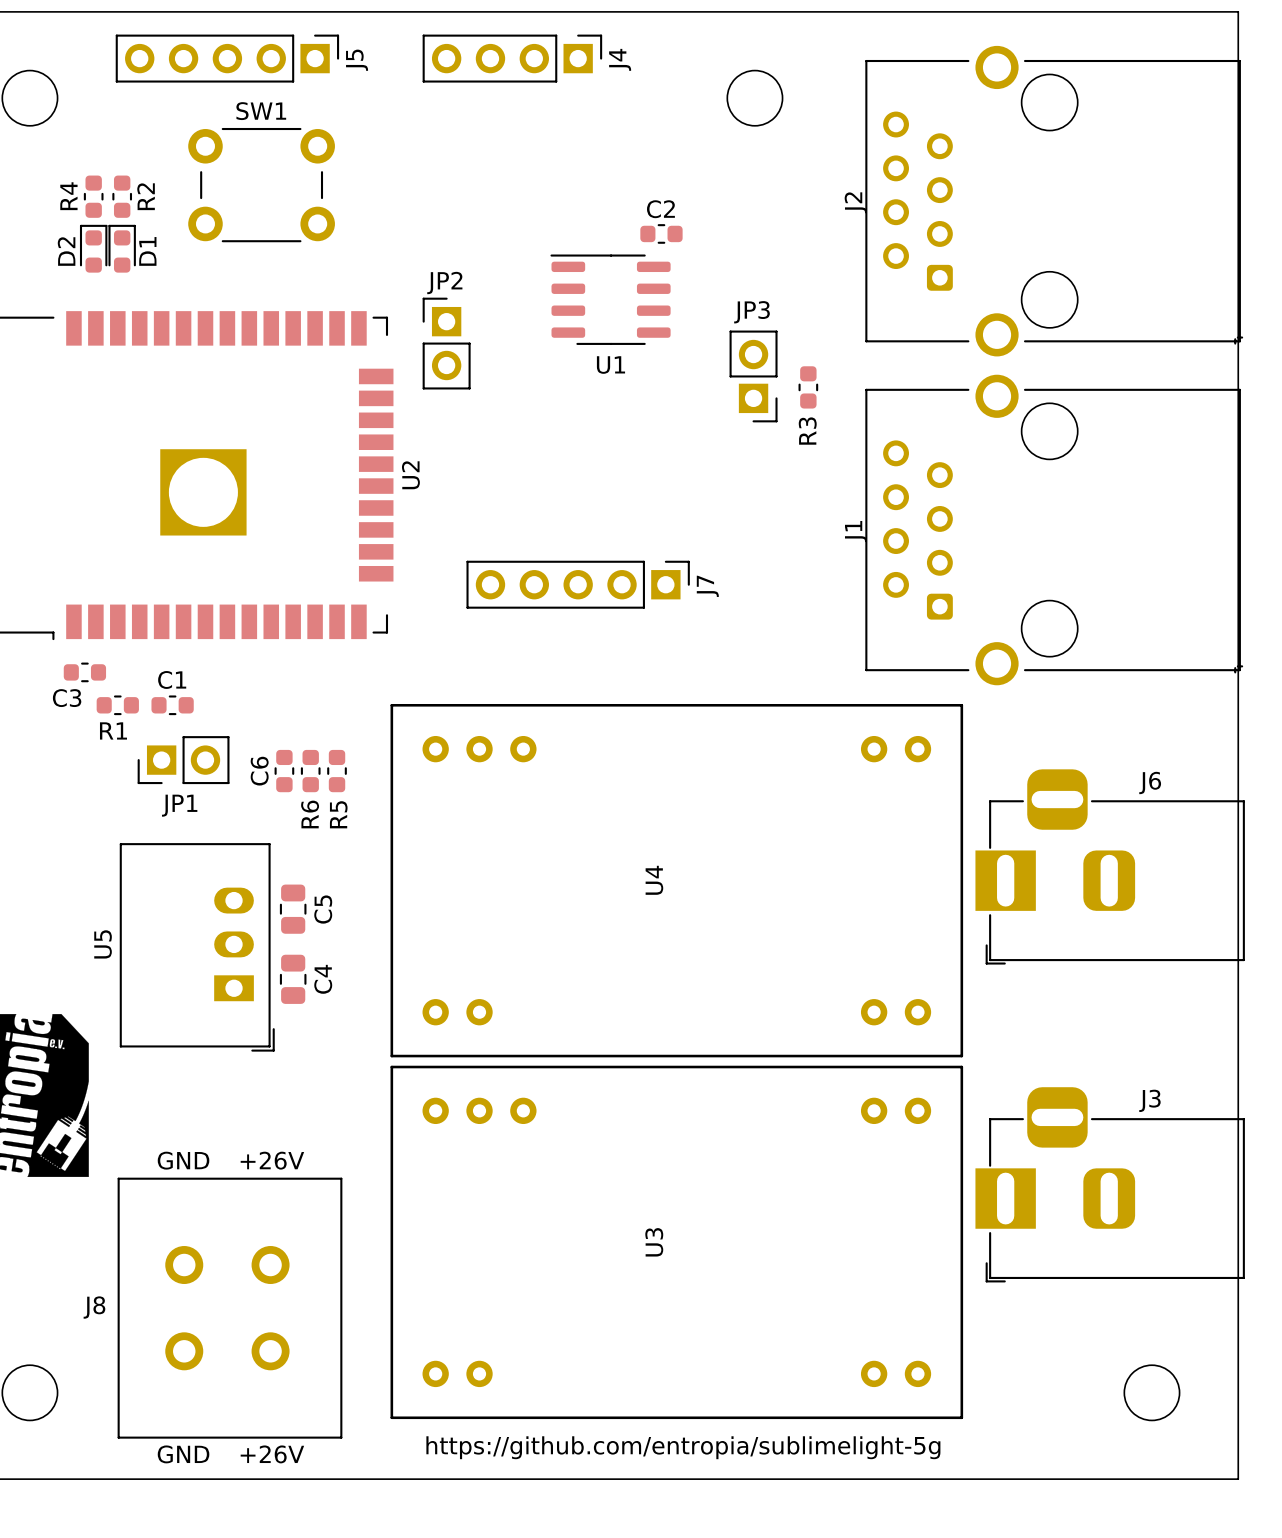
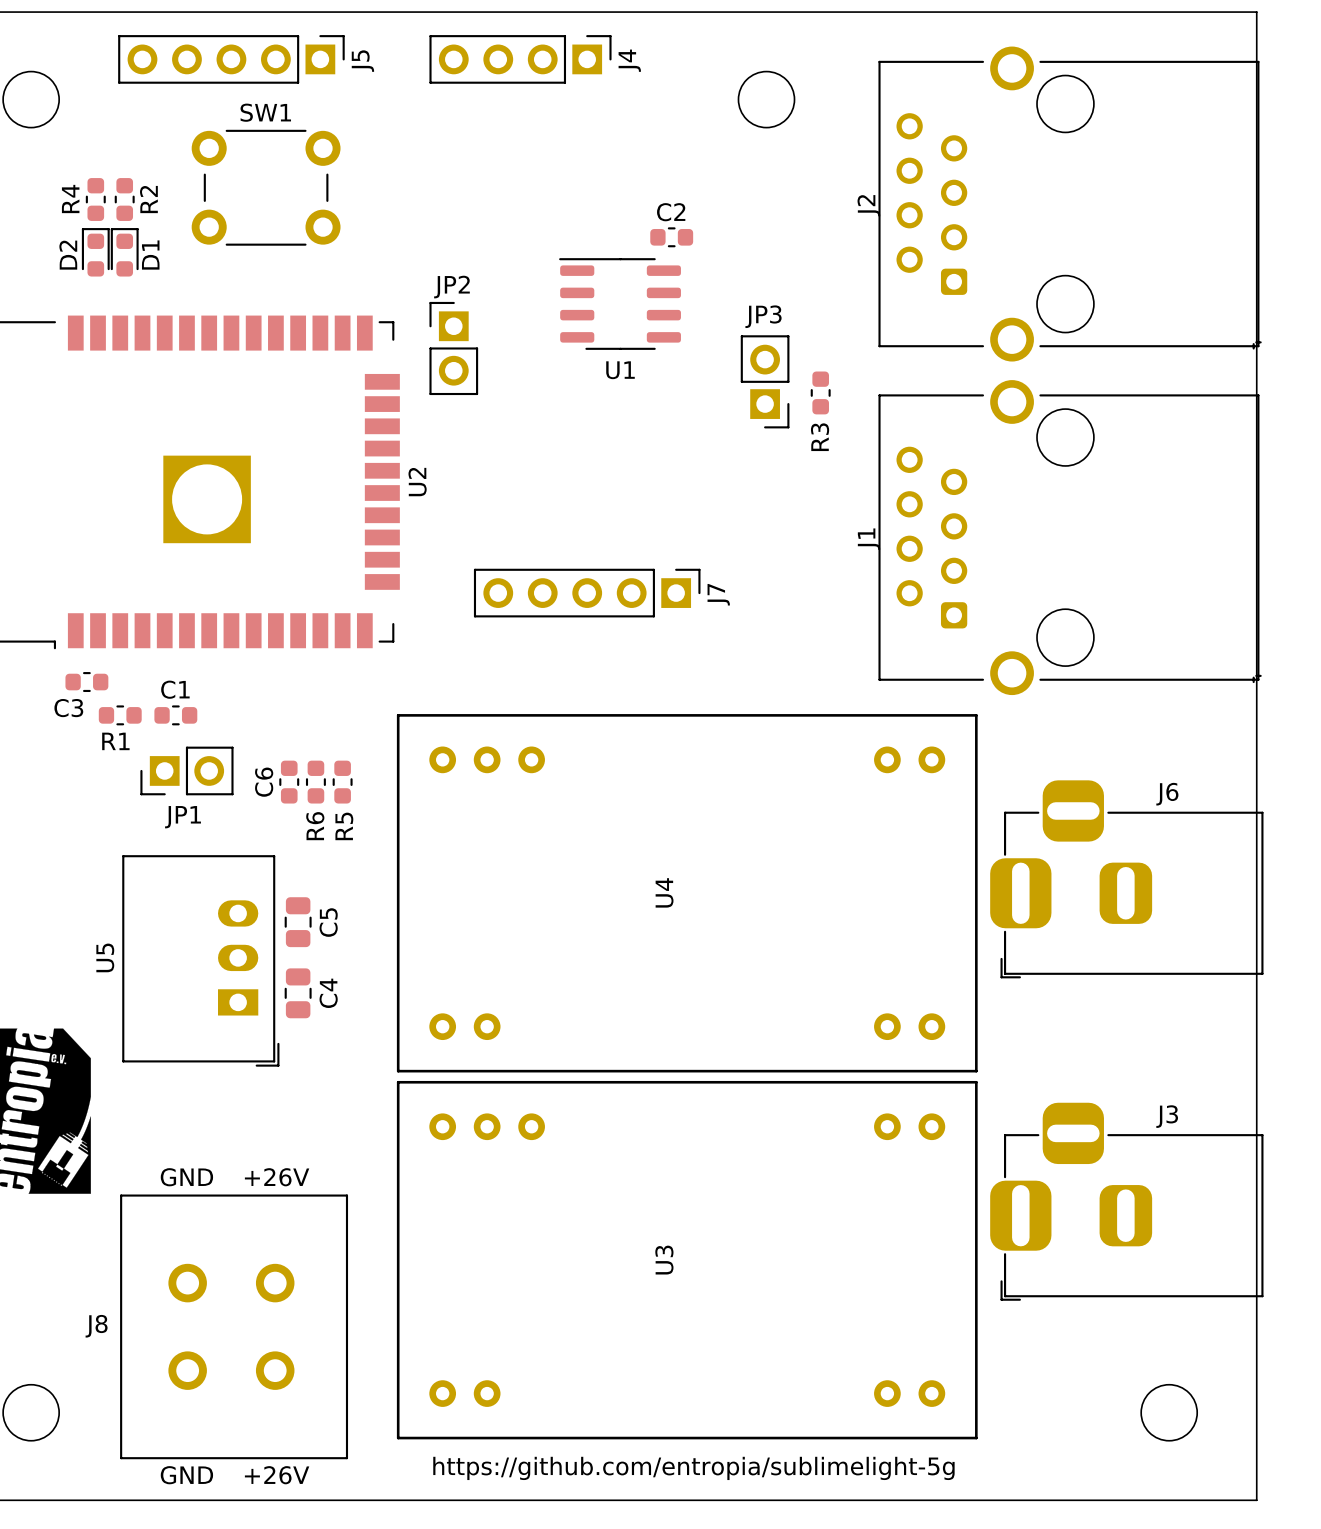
J6 footprint: [975, 769, 1245, 965] -> [990, 780, 1264, 979]
J3 footprint: [975, 1087, 1245, 1283] -> [990, 1102, 1264, 1301]

